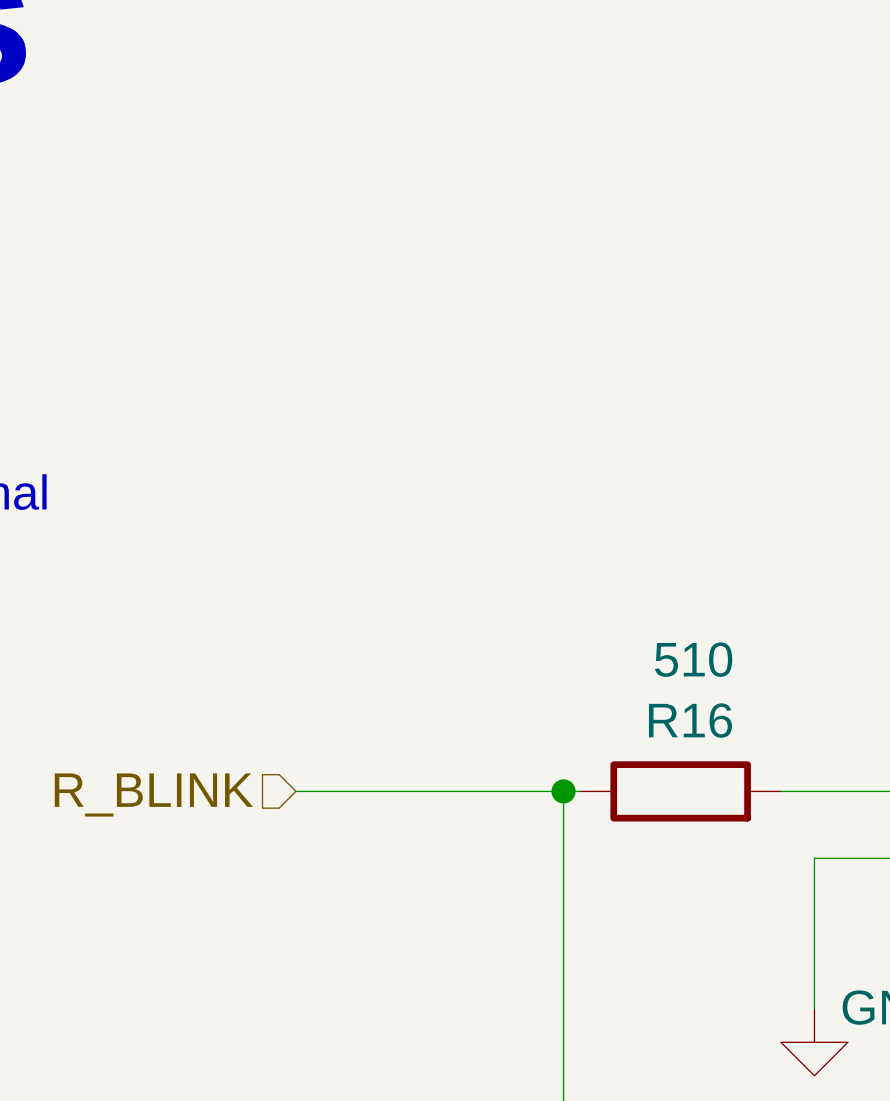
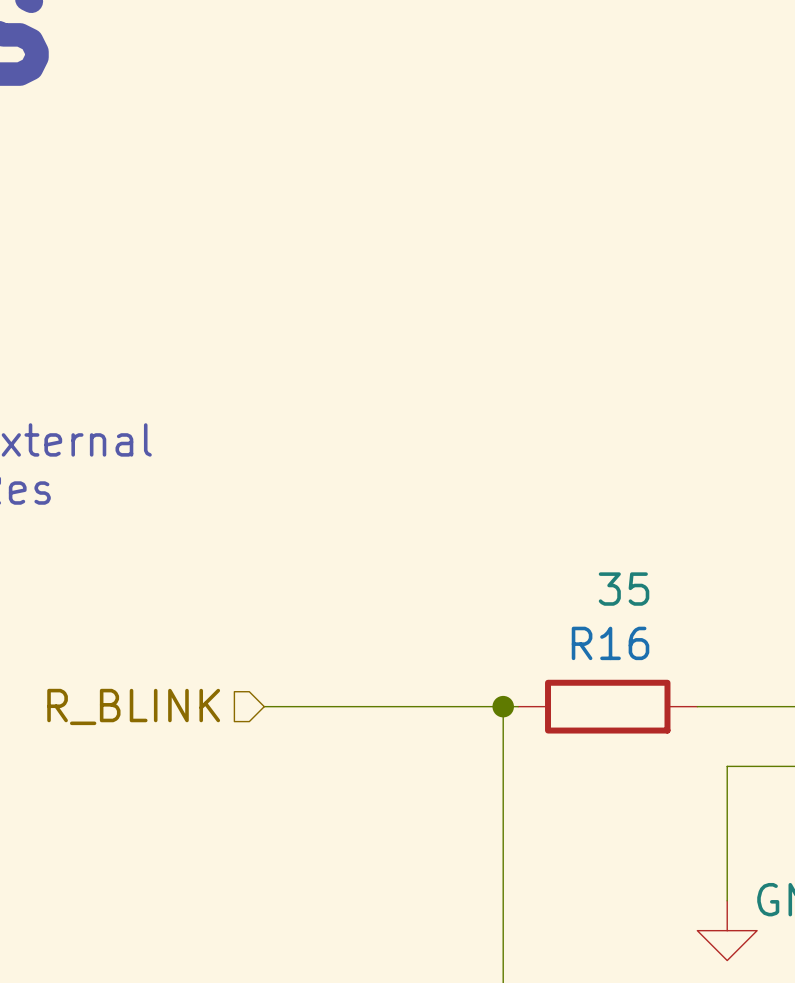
R16 value: 510 (693, 659) -> 35 (624, 589)

